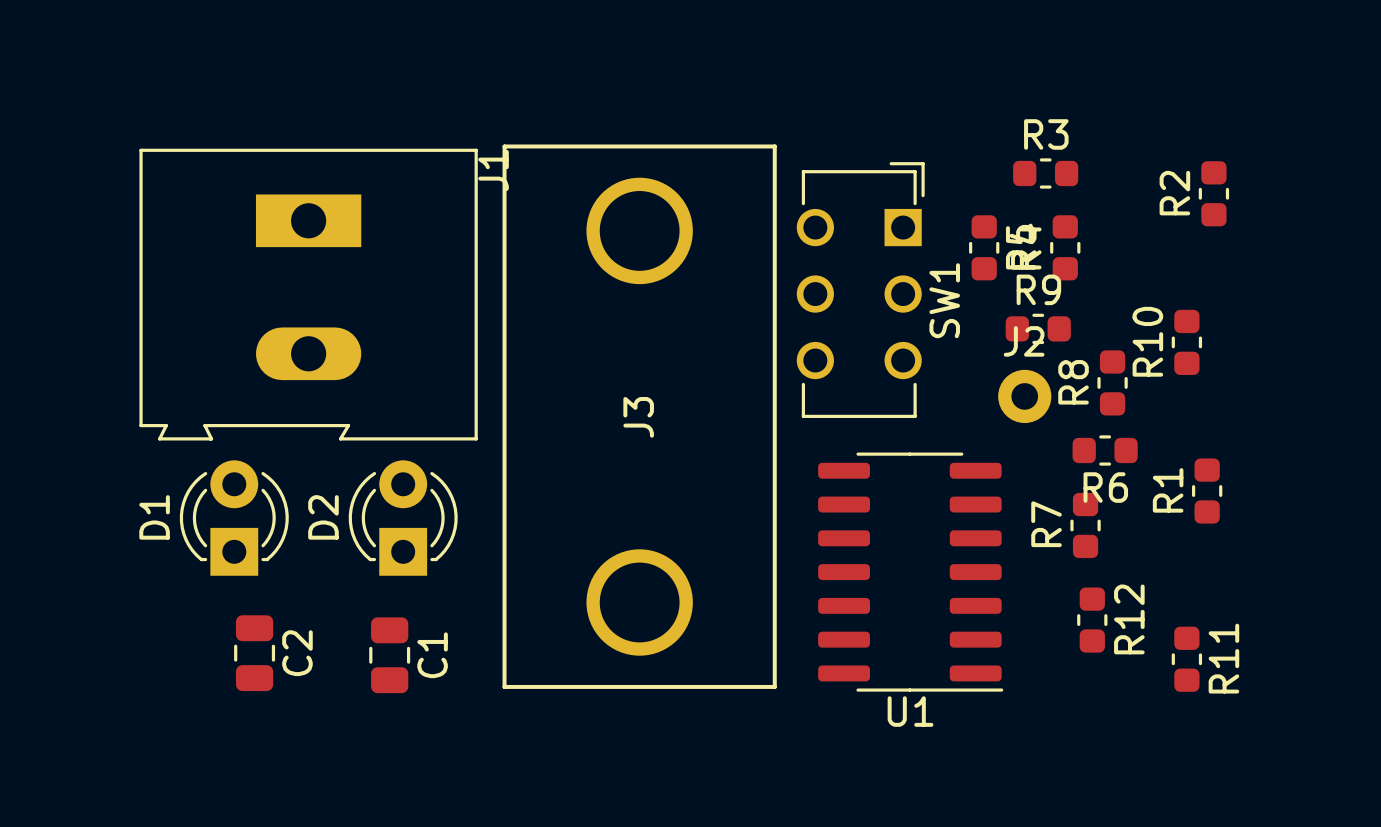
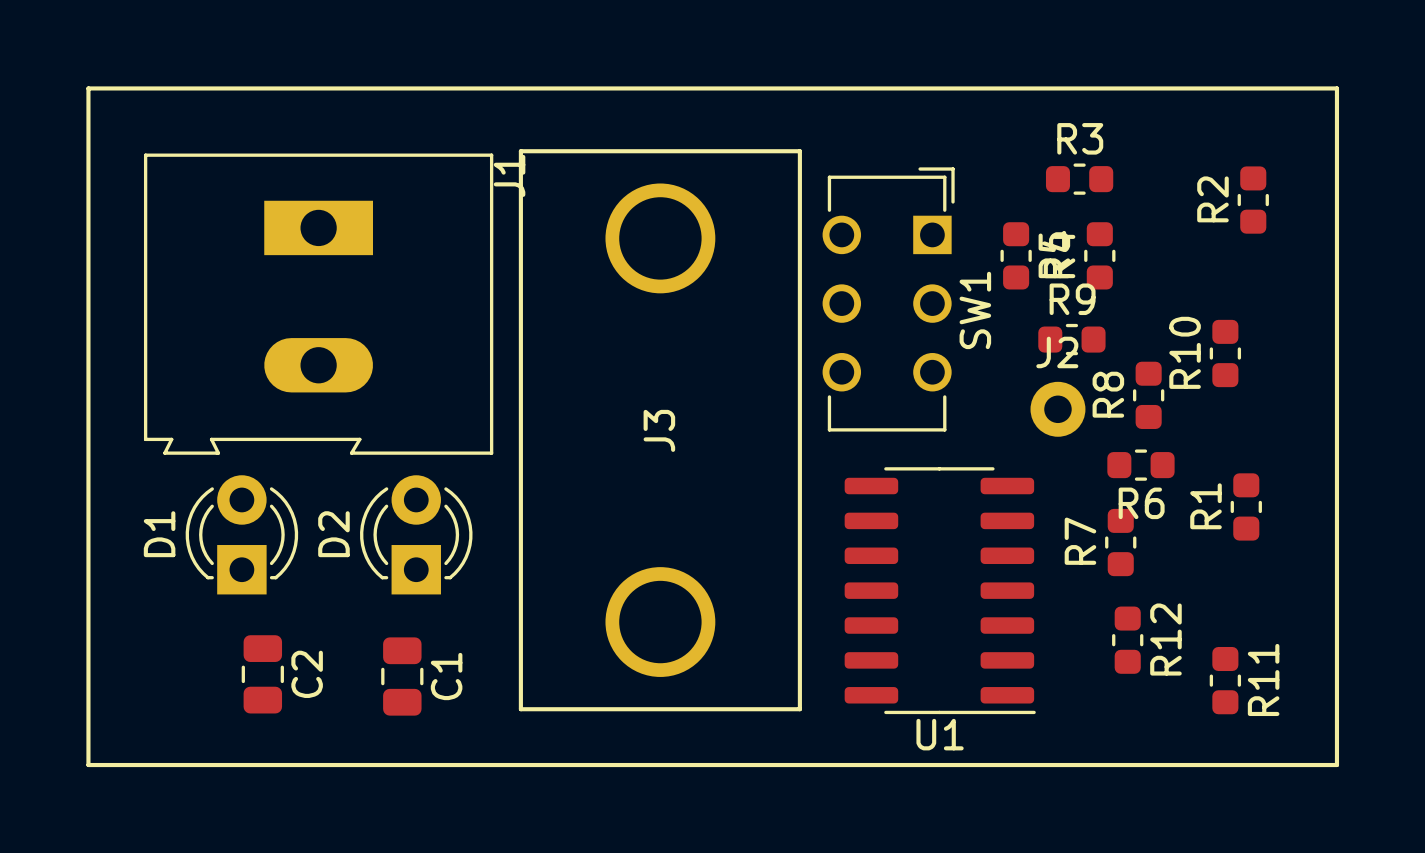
line: none -> (88, 88) (1336, 88) (1336, 765) (88, 765) (88, 88)

